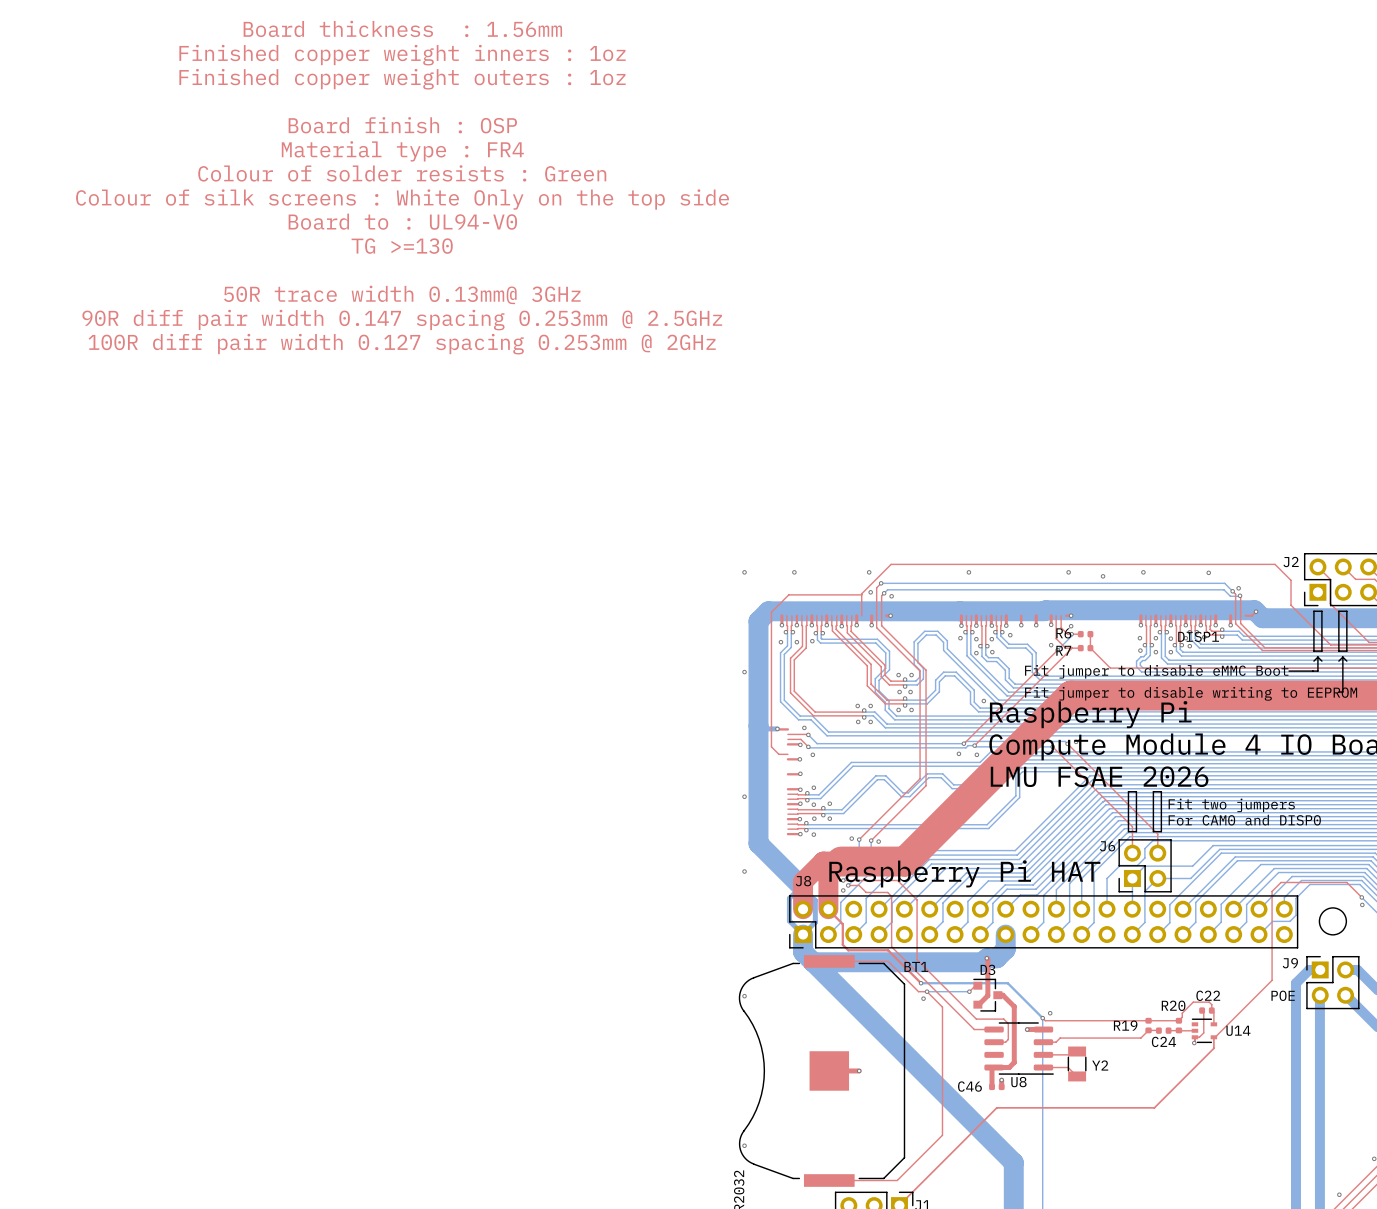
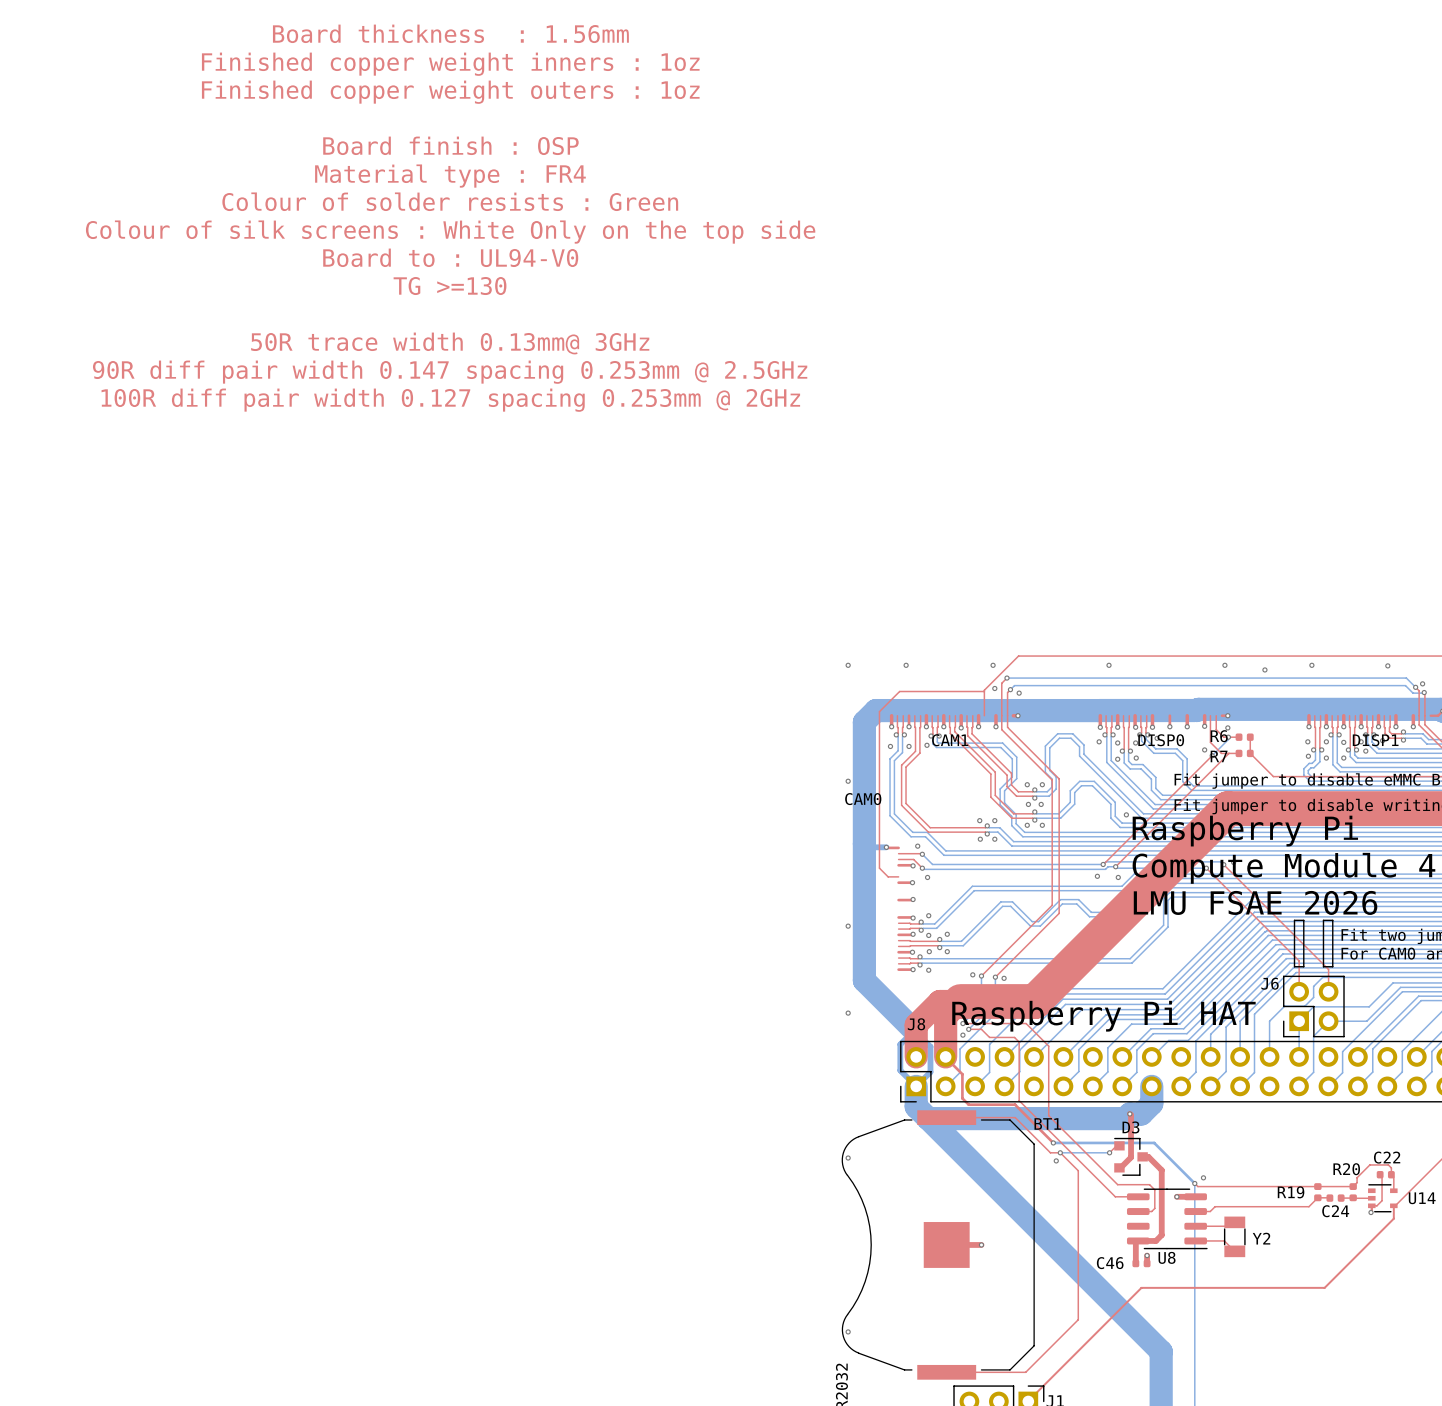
text: none -> CAM1 (950, 740)
text: none -> DISP0 (1161, 740)
text: none -> CAM0 (863, 799)

